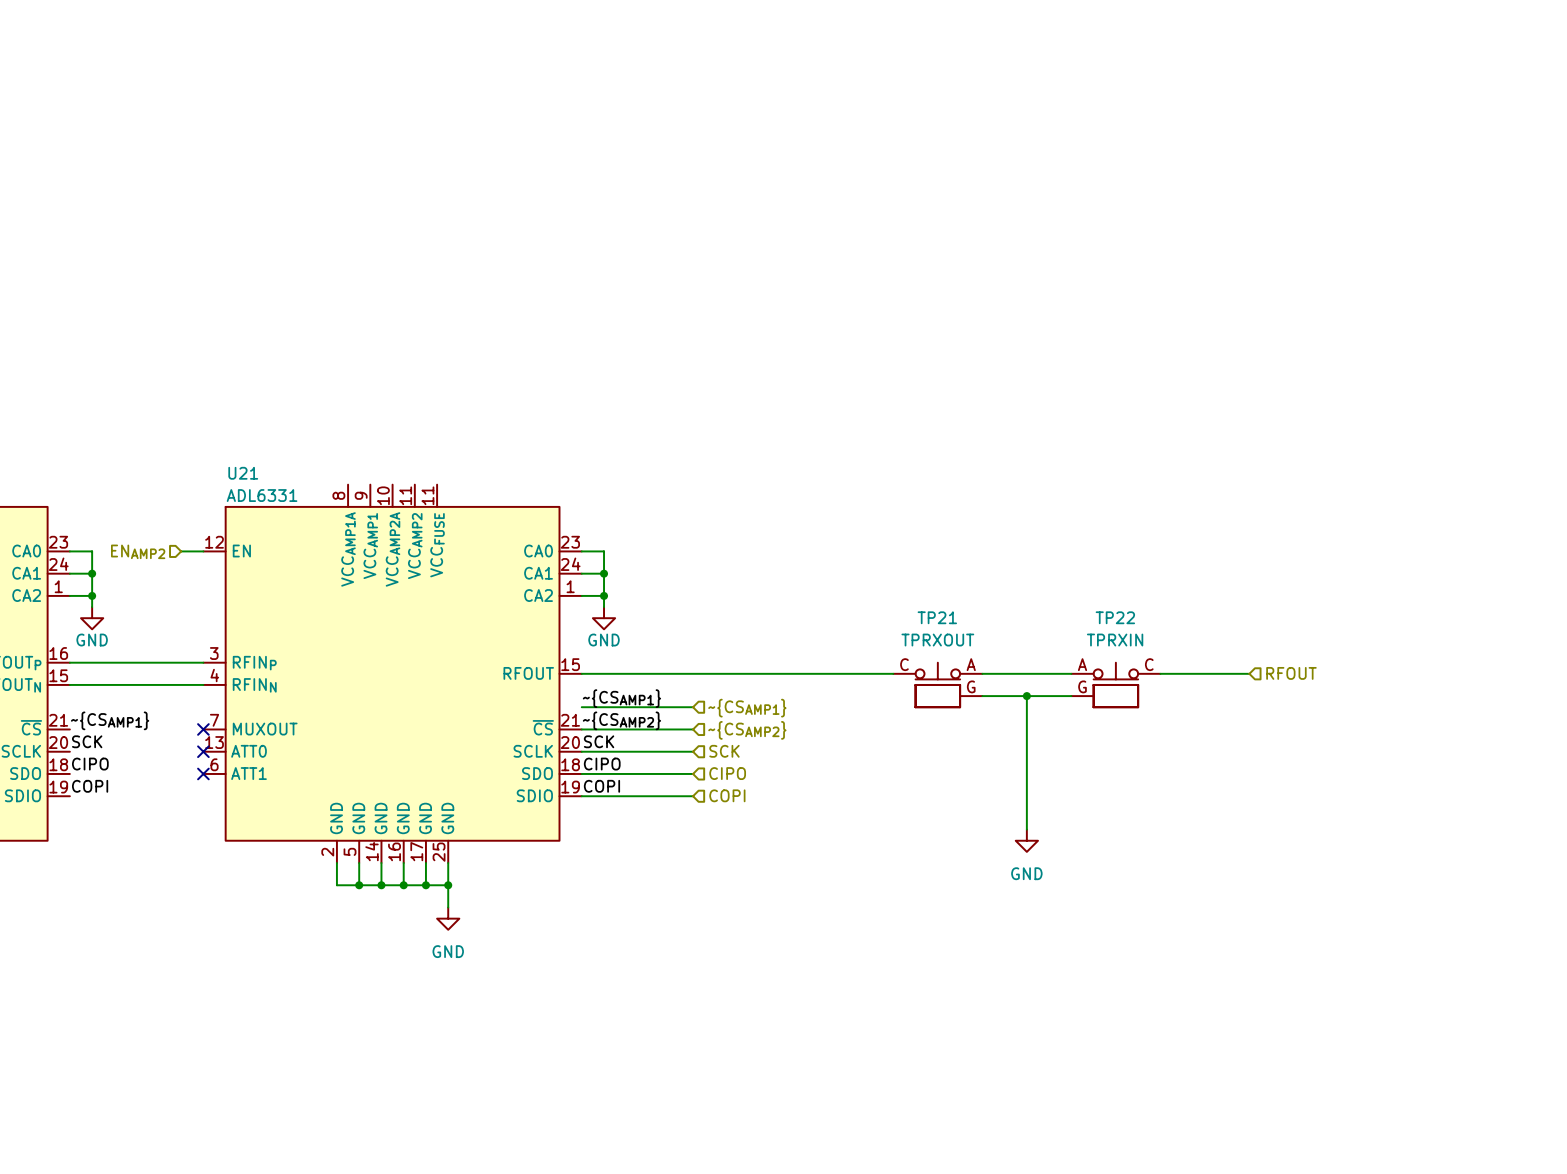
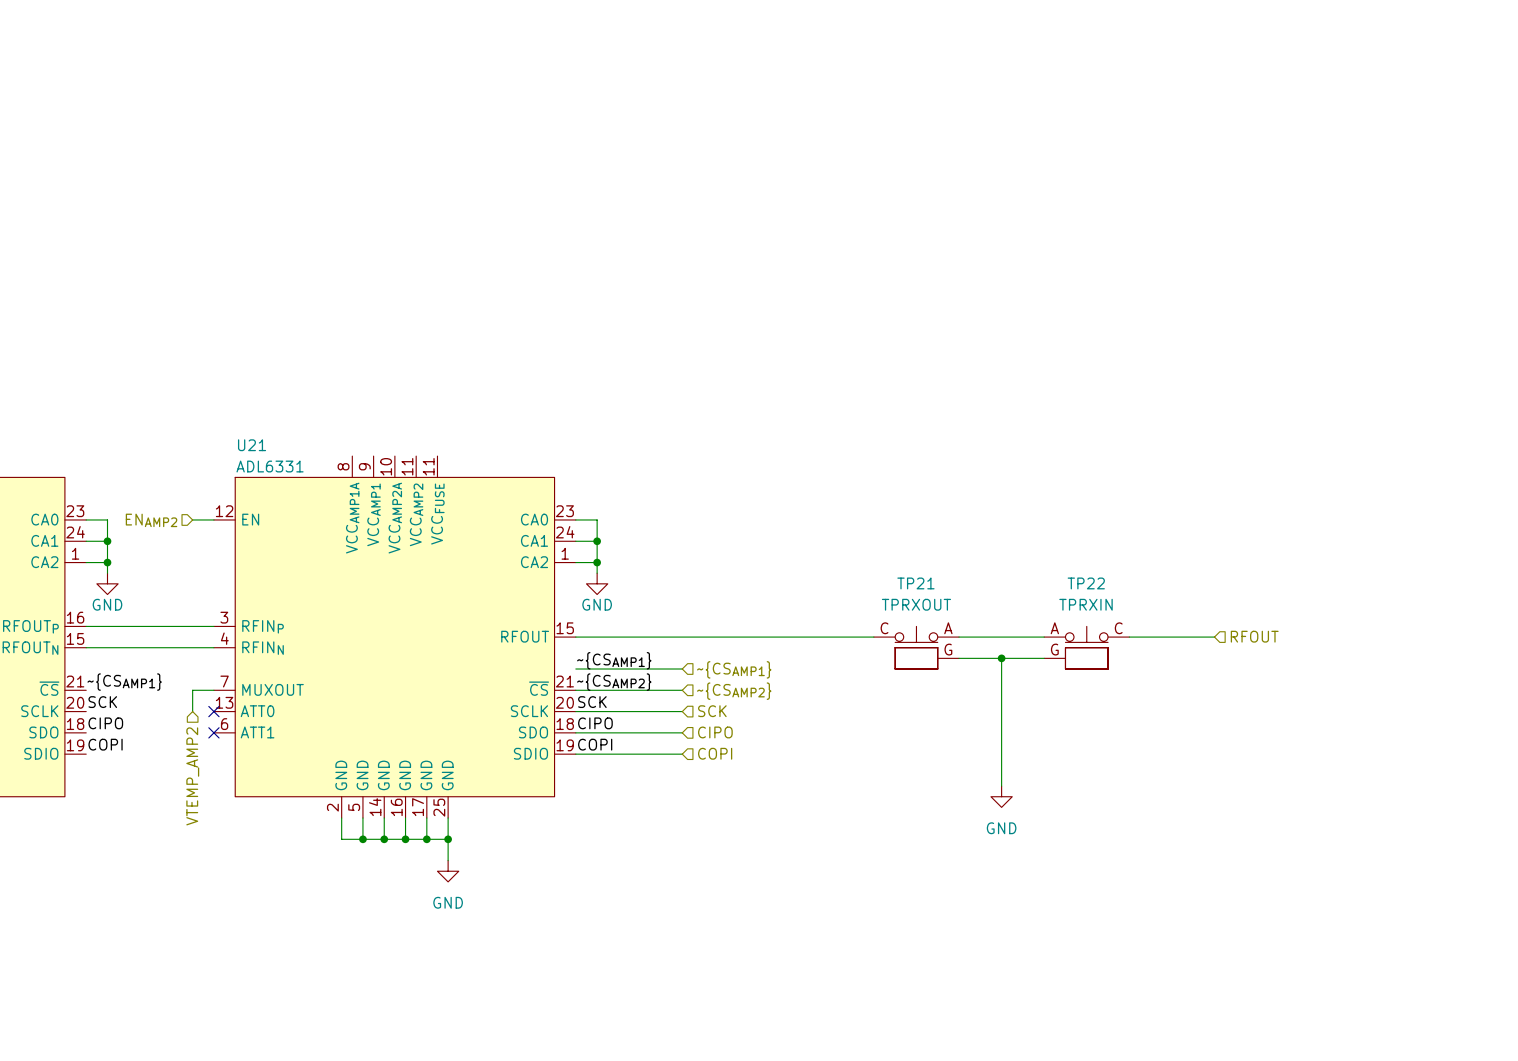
wire: none -> (213, 690) (192, 690) (192, 711)
no-connect mark: (203, 729) -> none
hierarchical label: none -> VTEMP_AMP2 (192, 776)

